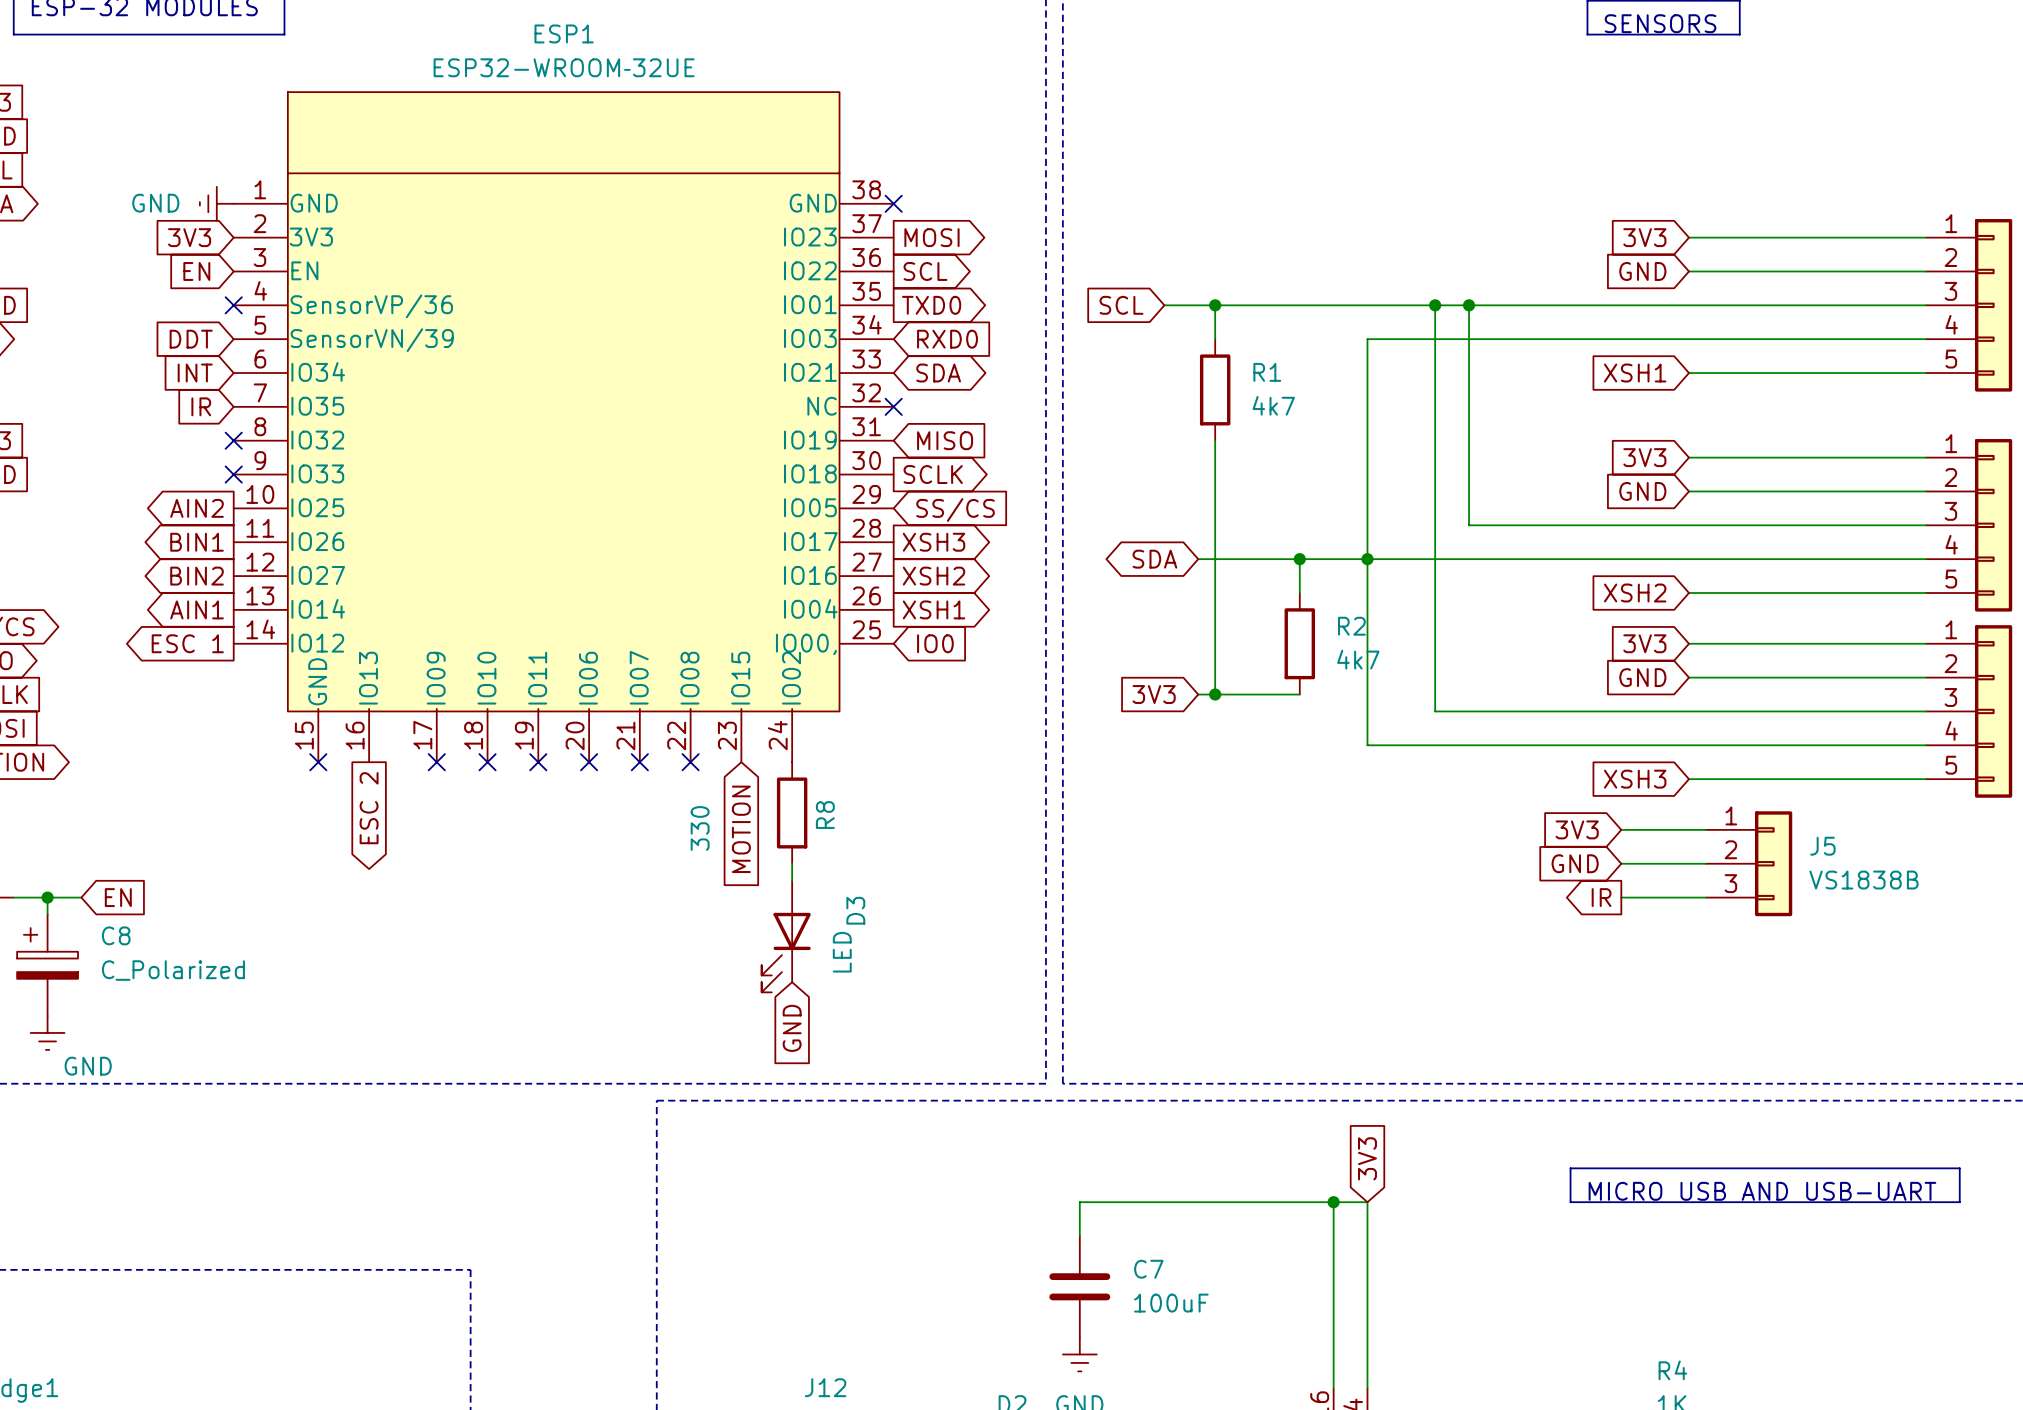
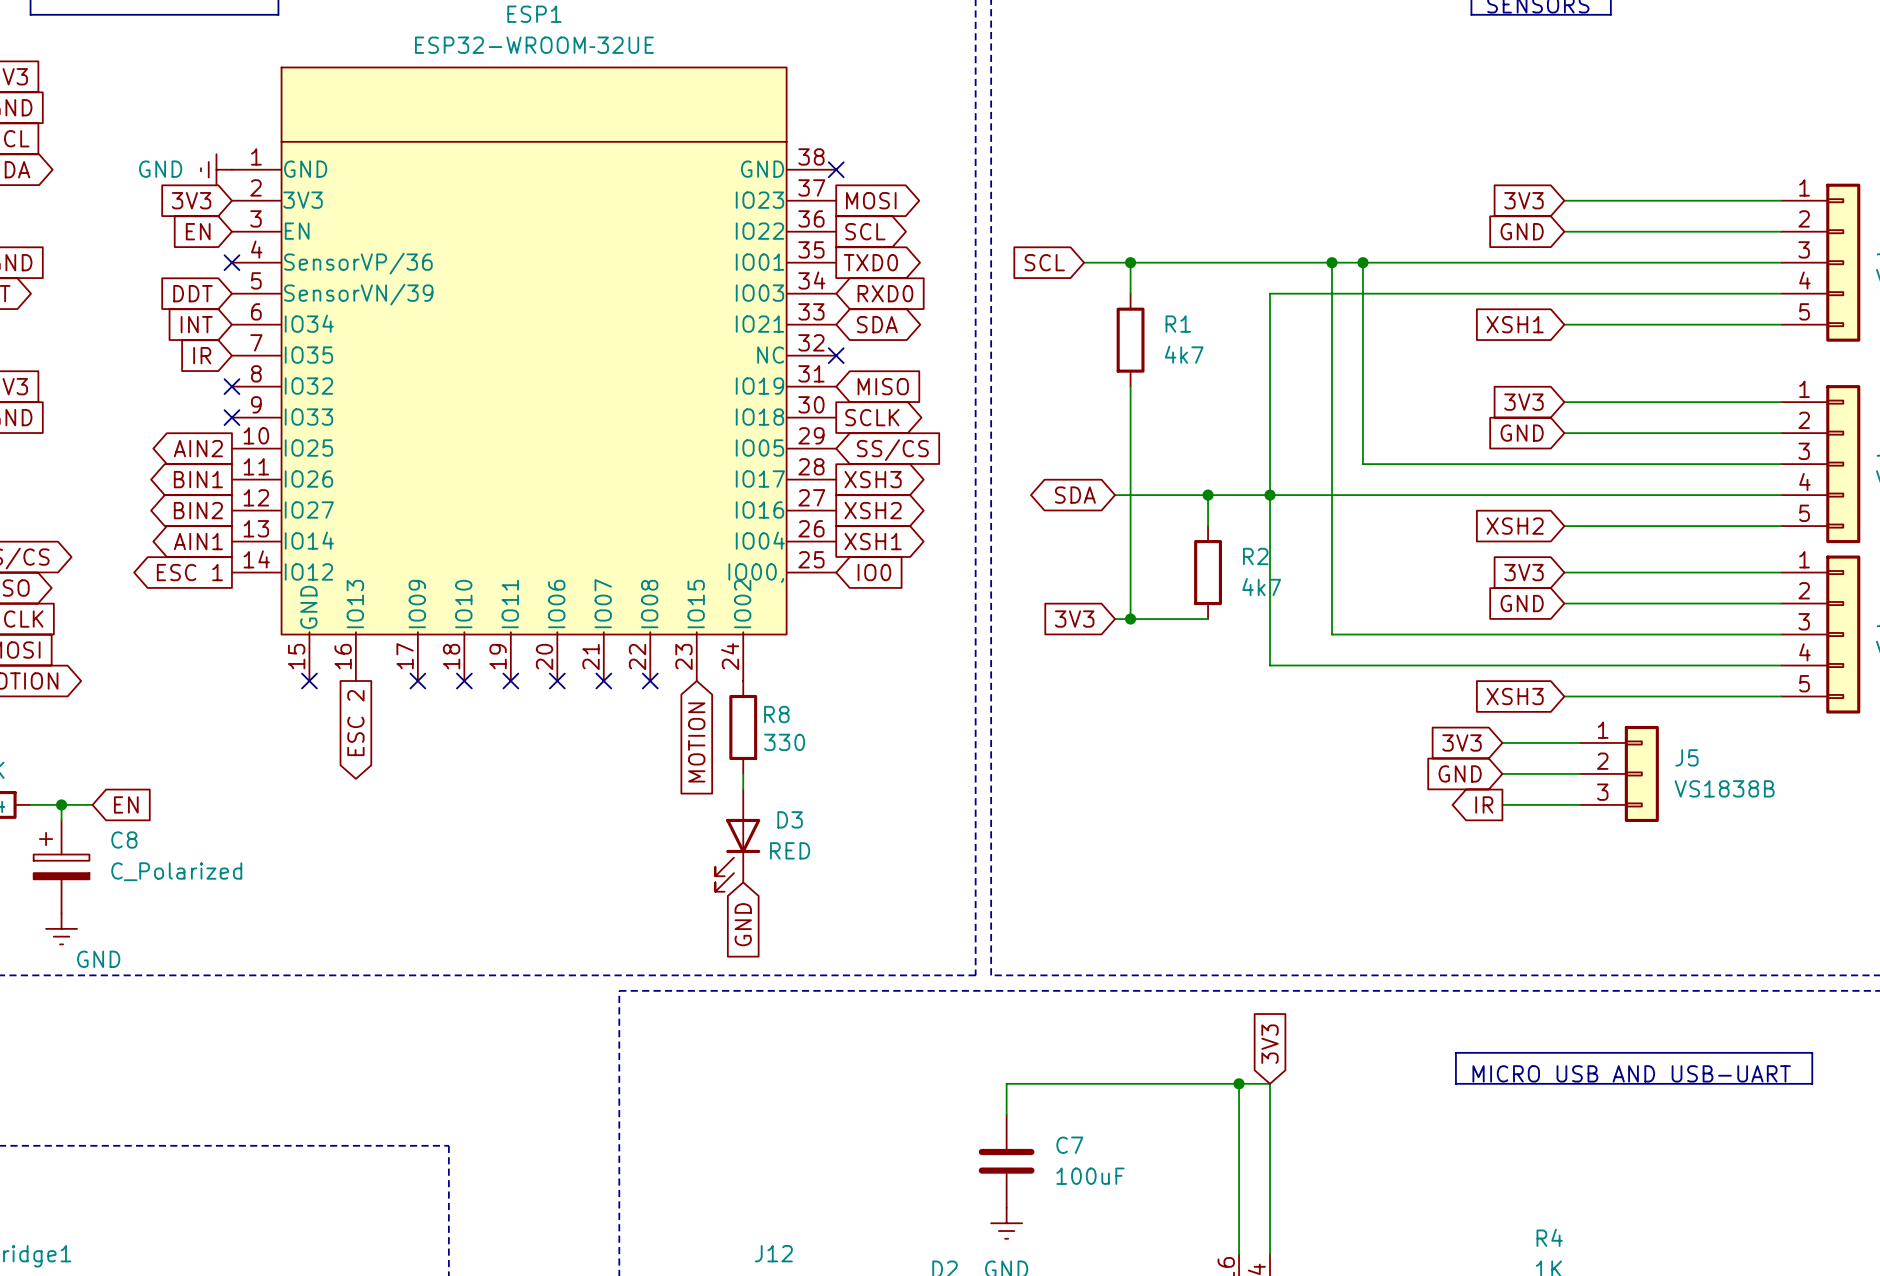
R8 name rotation: 0° (825, 815) -> 90° clockwise (776, 714)
R8 value rotation: 0° (700, 828) -> 90° clockwise (784, 742)
R8 value position: 330 (700, 828) -> 330 (784, 742)
D3 name rotation: 0° (855, 910) -> 90° clockwise (790, 819)
D3 value: LED (842, 952) -> RED (790, 850)

